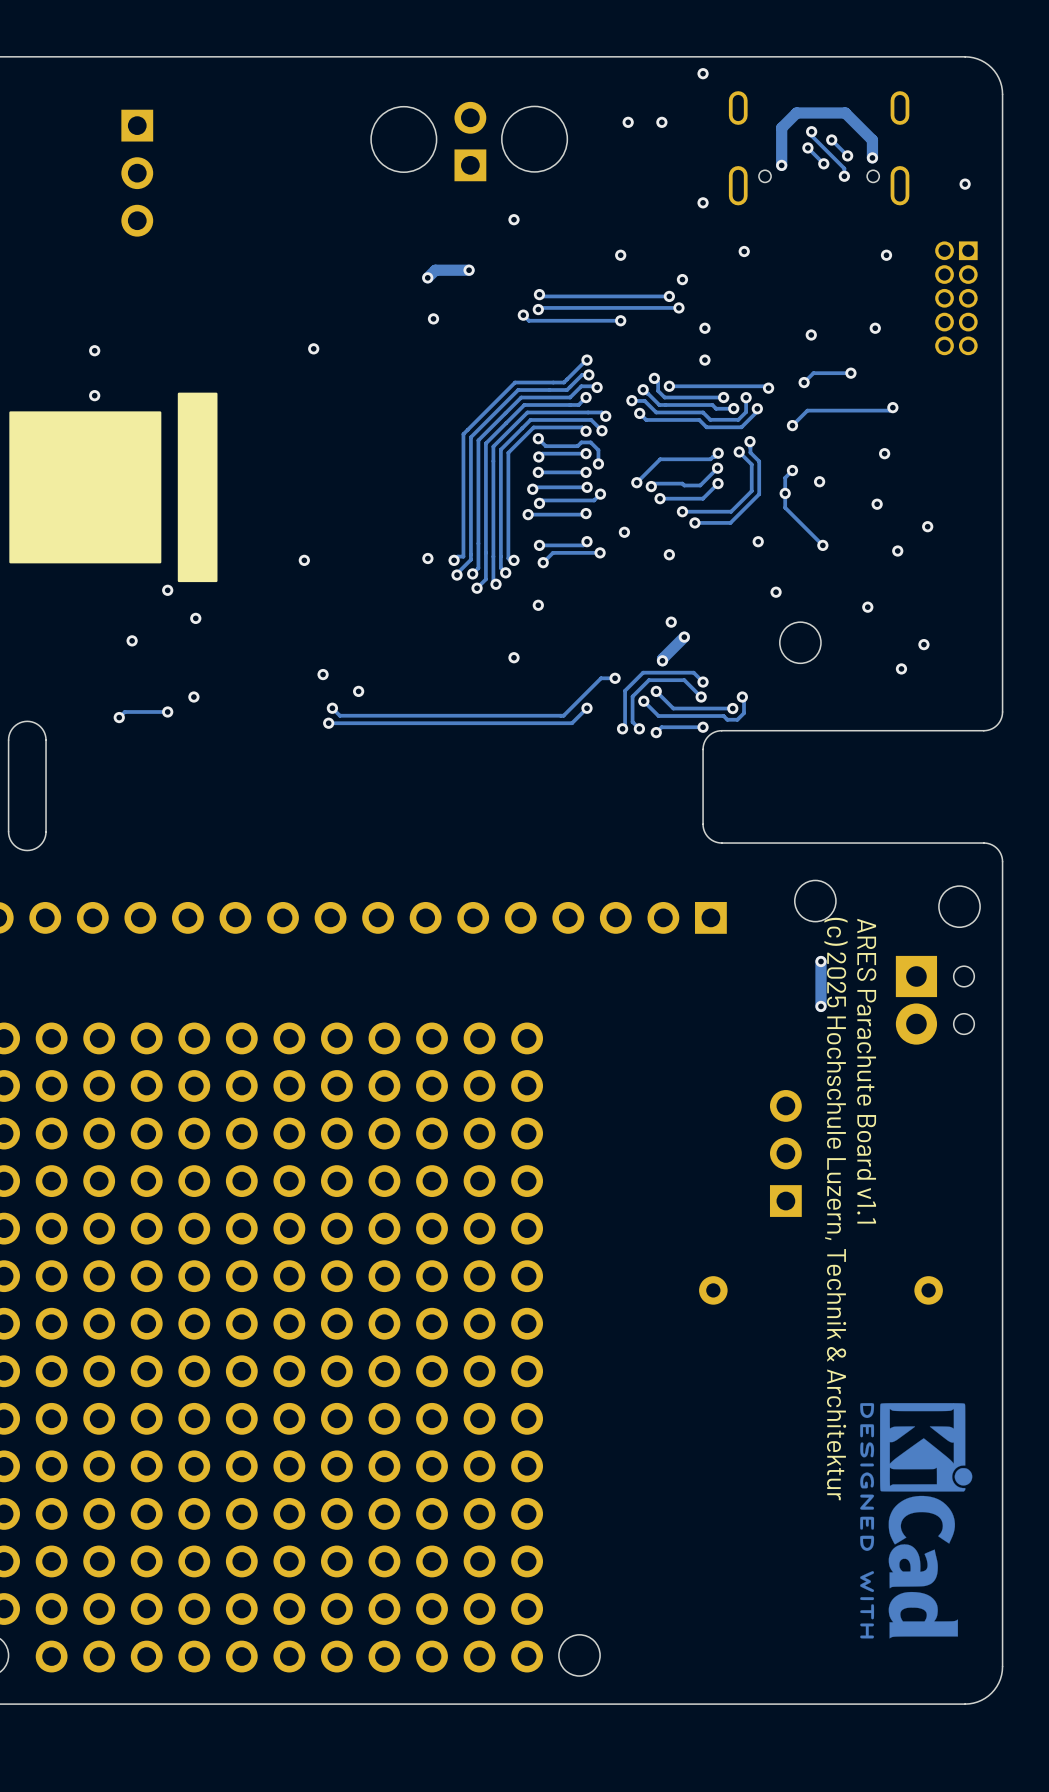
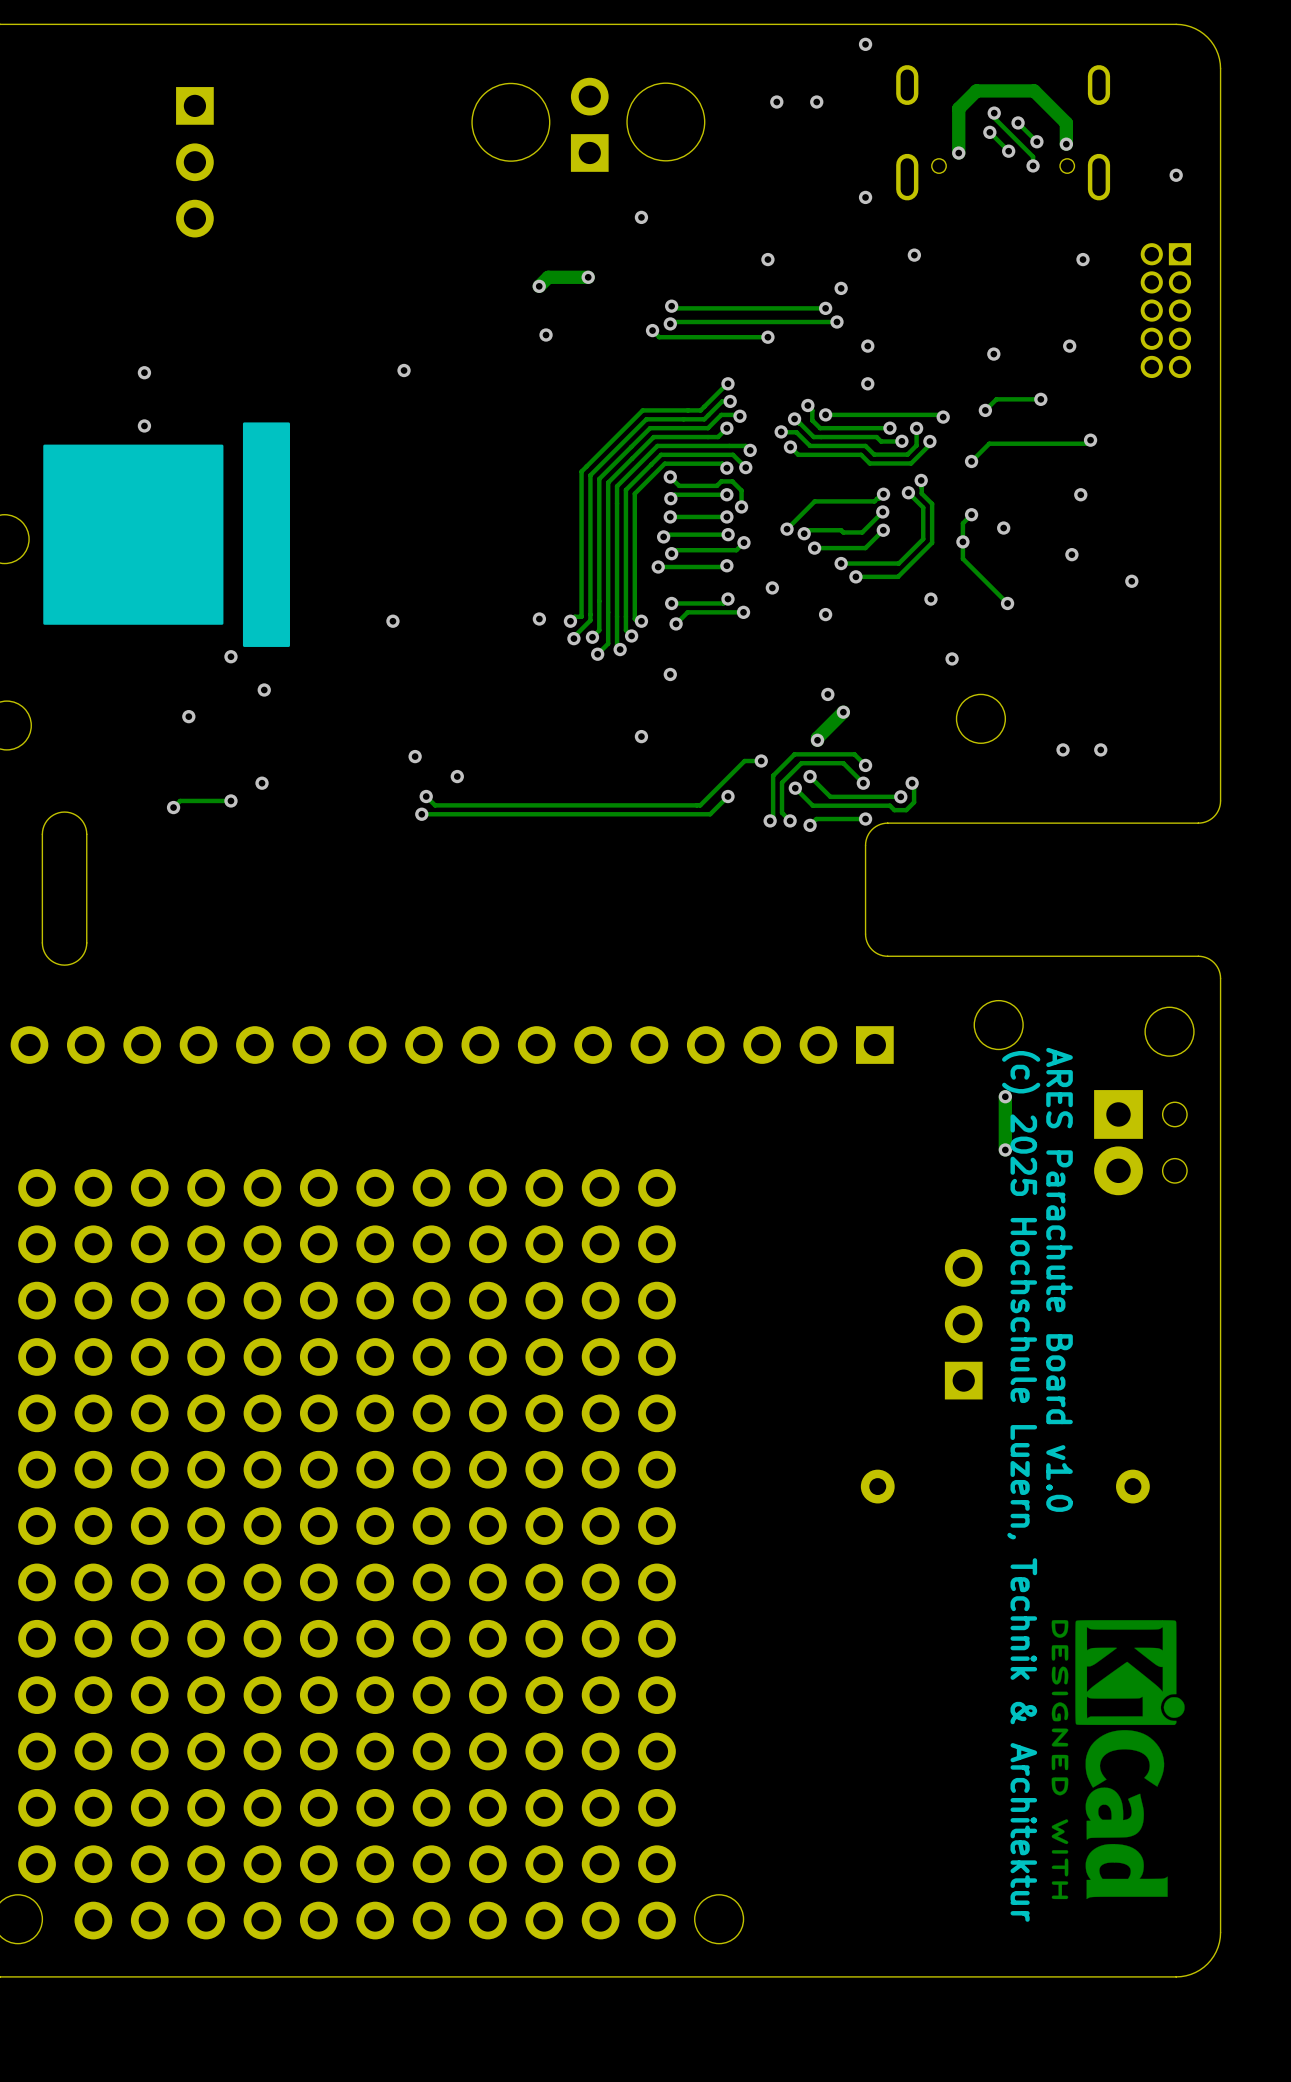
via: (897, 551) -> none
via: (867, 607) -> none
via: (923, 644) -> none
via: none -> (1063, 749)
text: ARES Parachute Board v1.1 (866, 1071) -> ARES Parachute Board v1.0 (1059, 1279)

